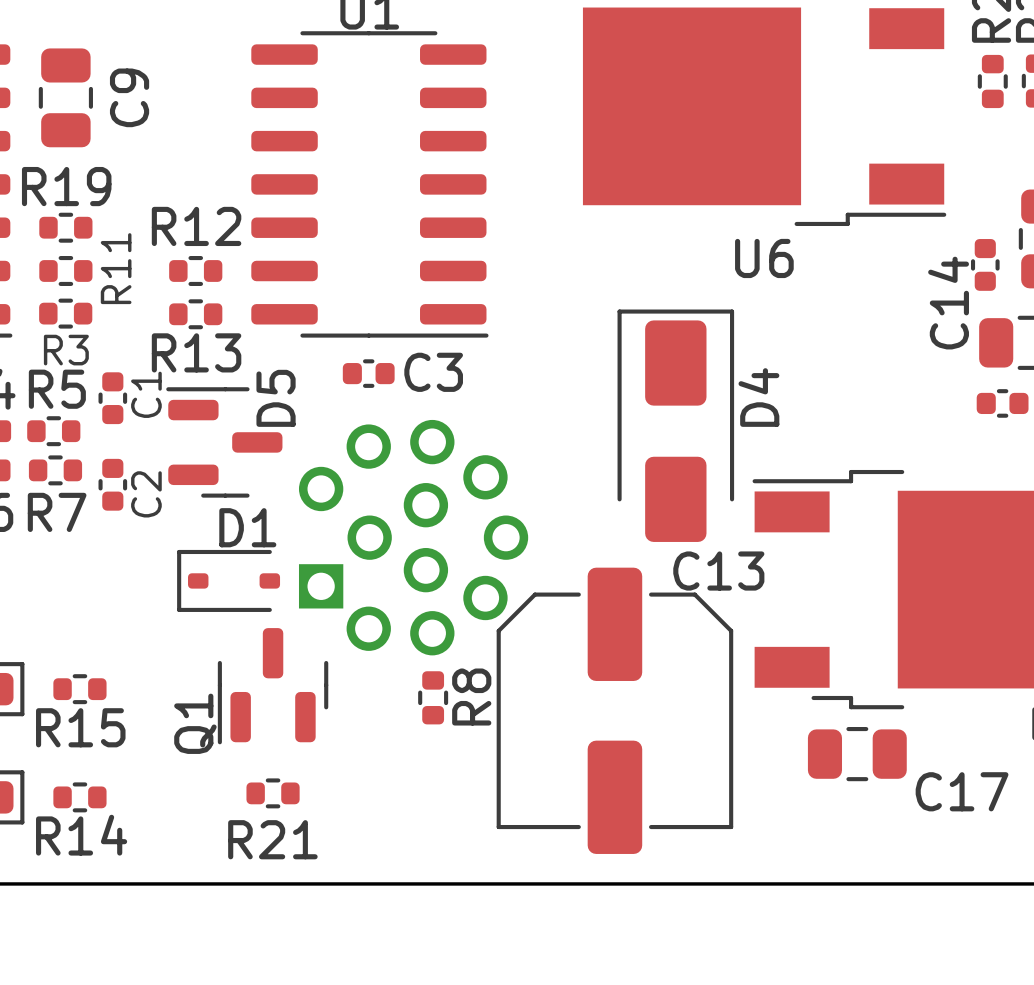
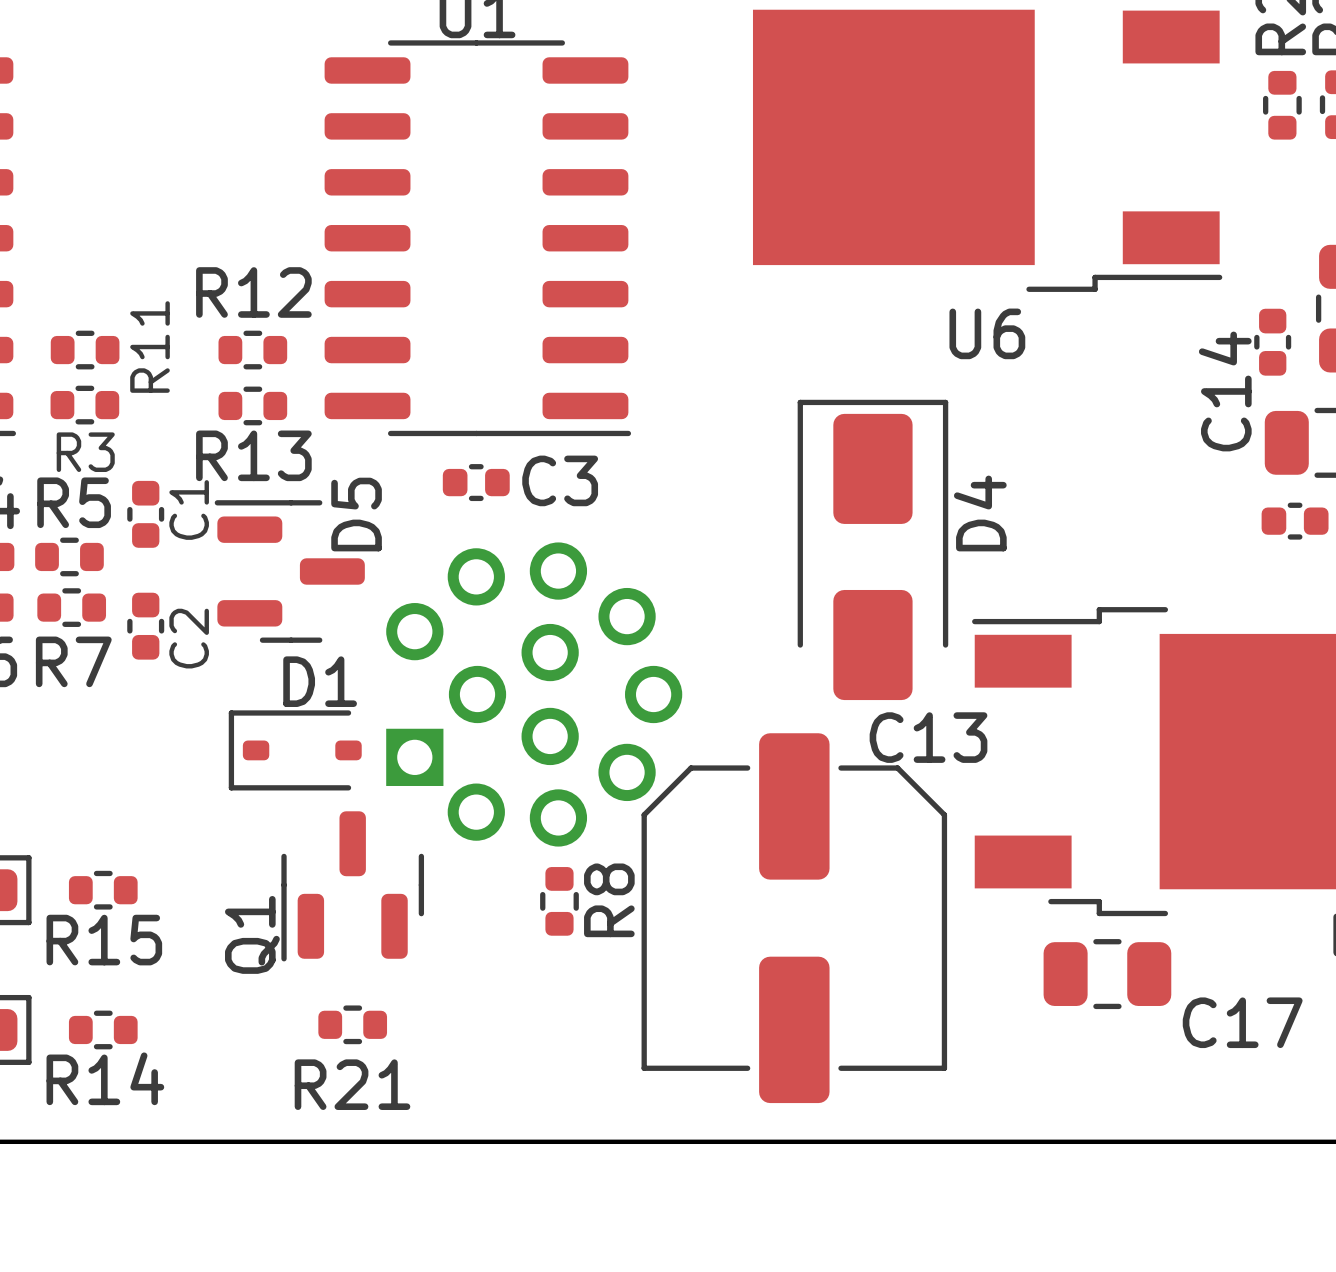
C9: (65, 97) -> none
R19: (65, 227) -> none

